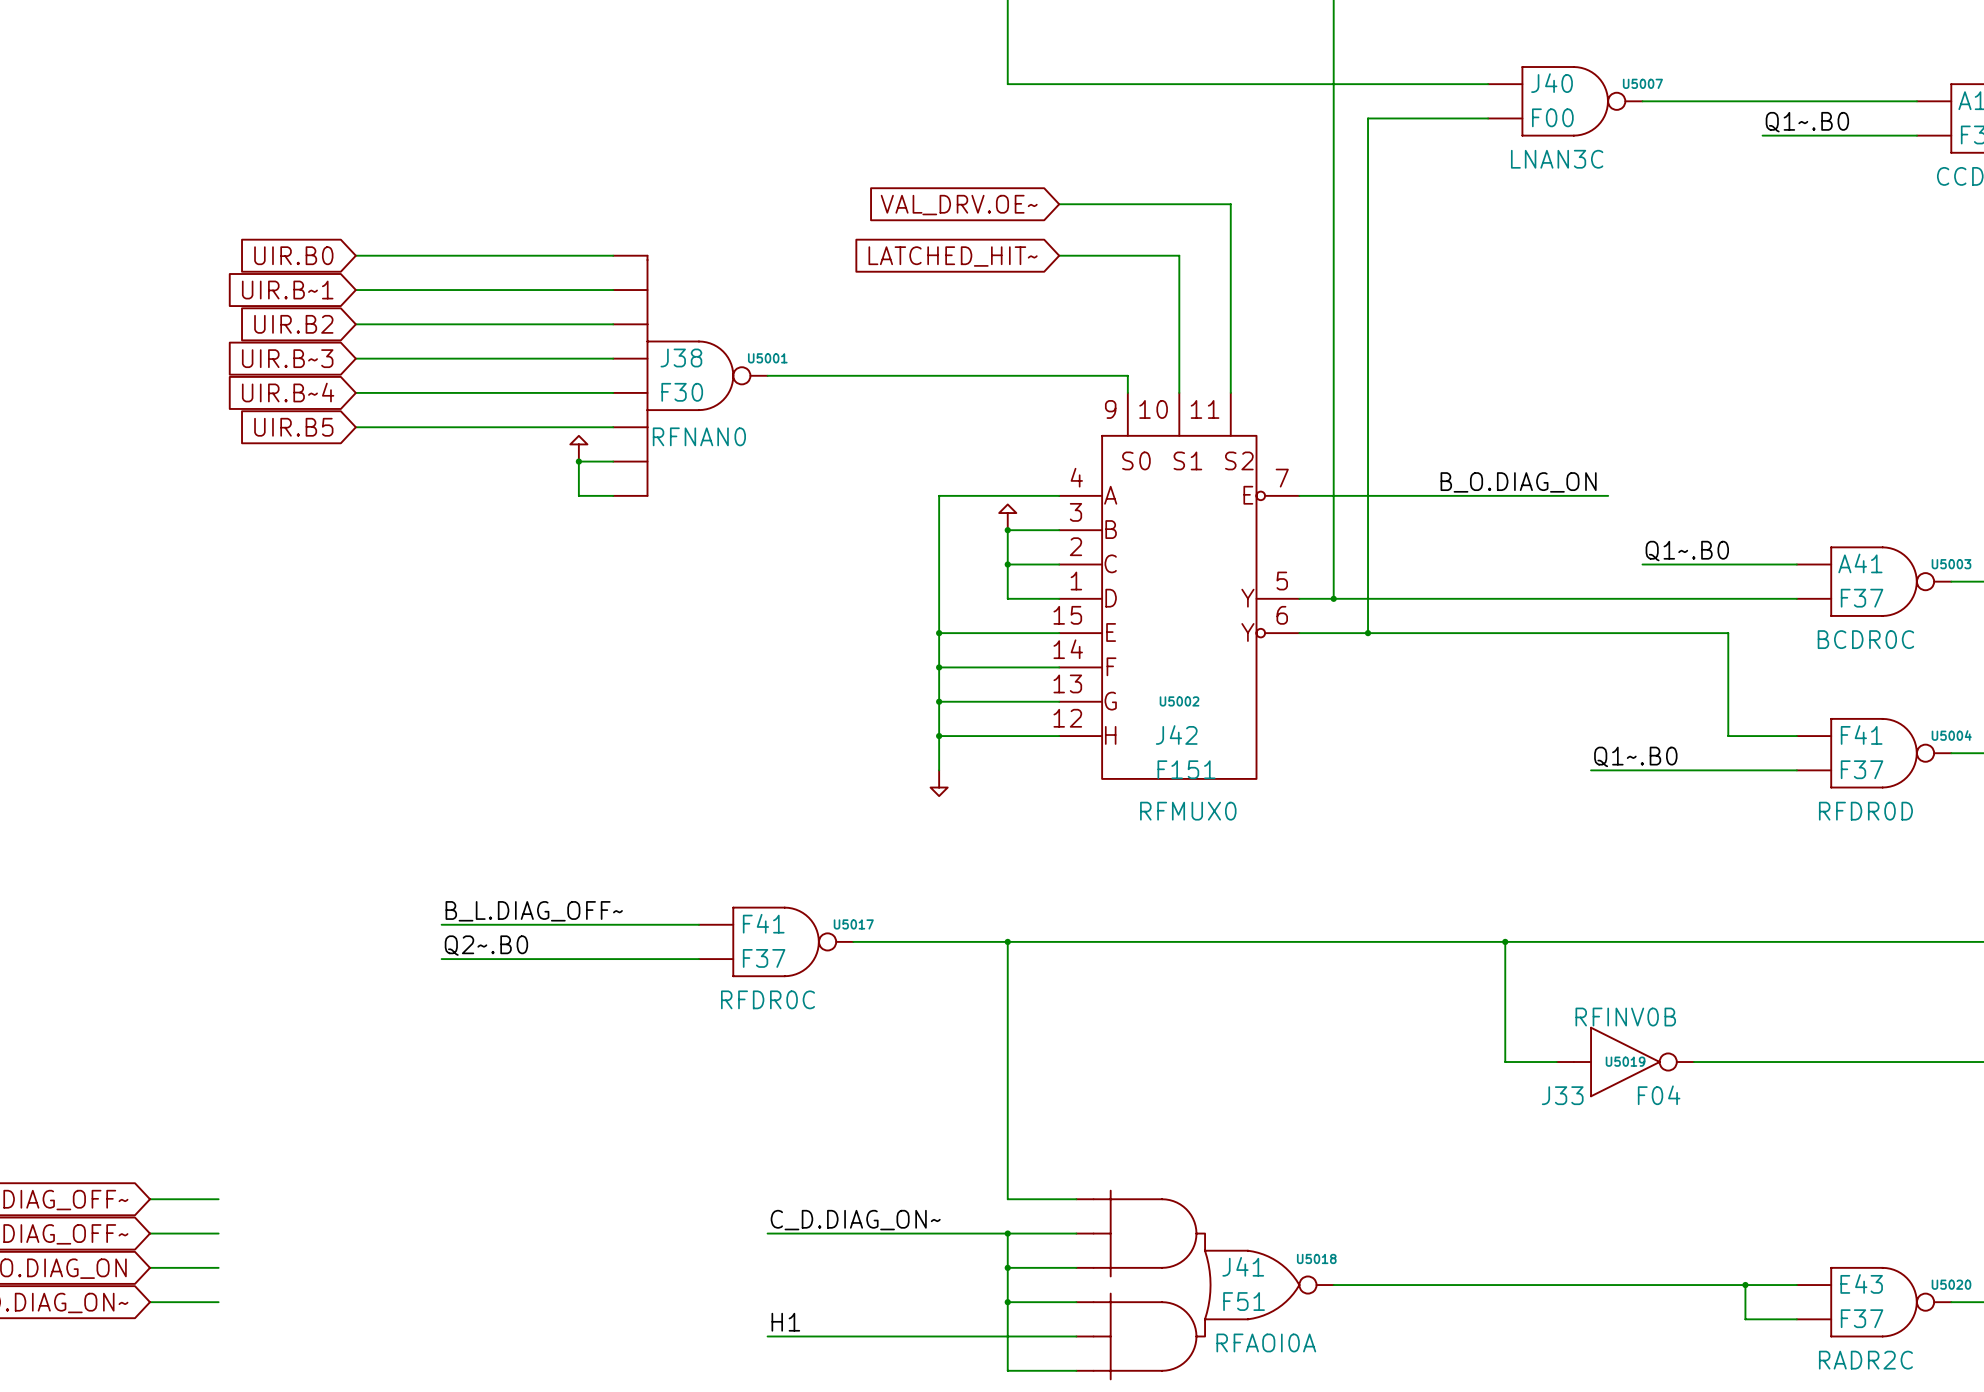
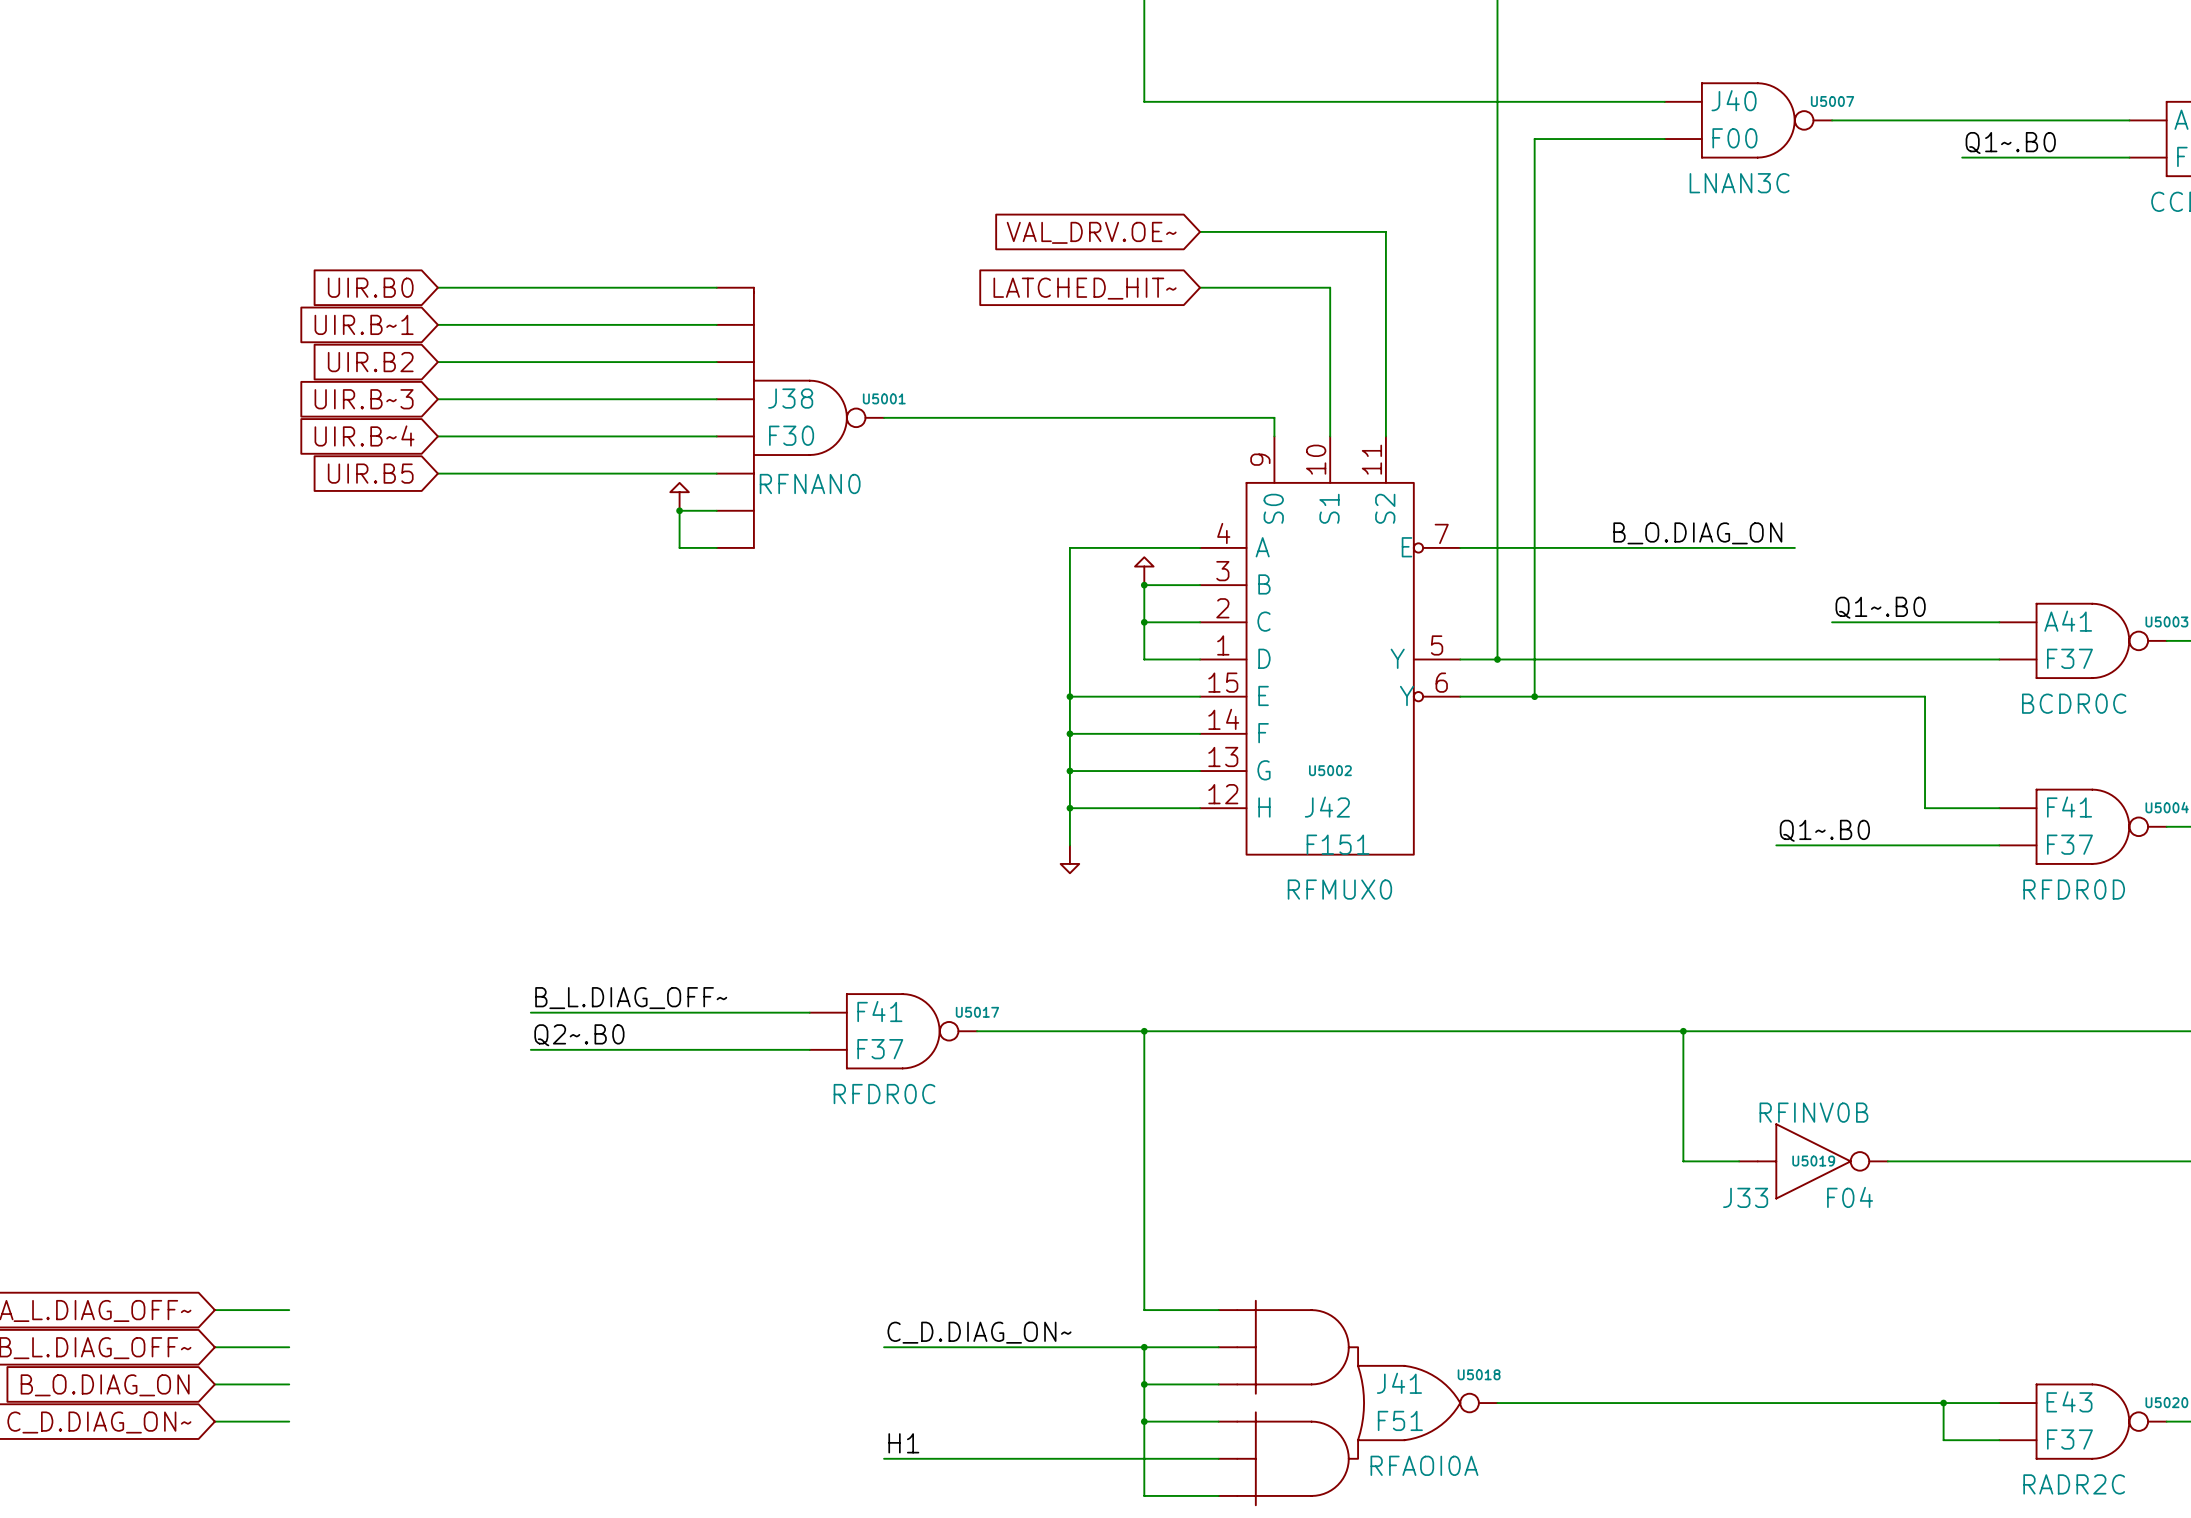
U5002 symbol: [1059, 392, 1300, 779] -> [1200, 436, 1461, 855]

